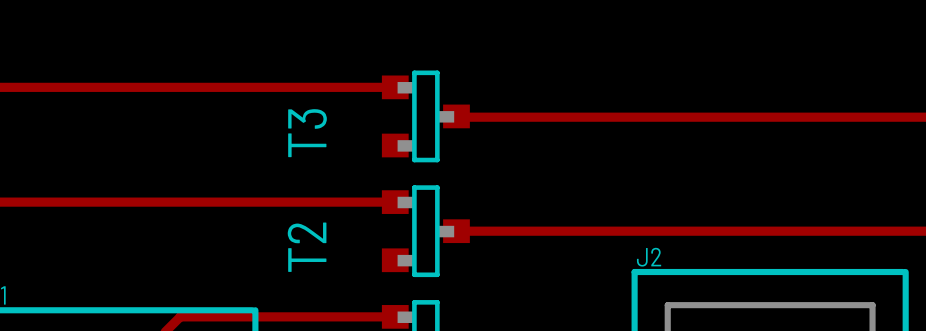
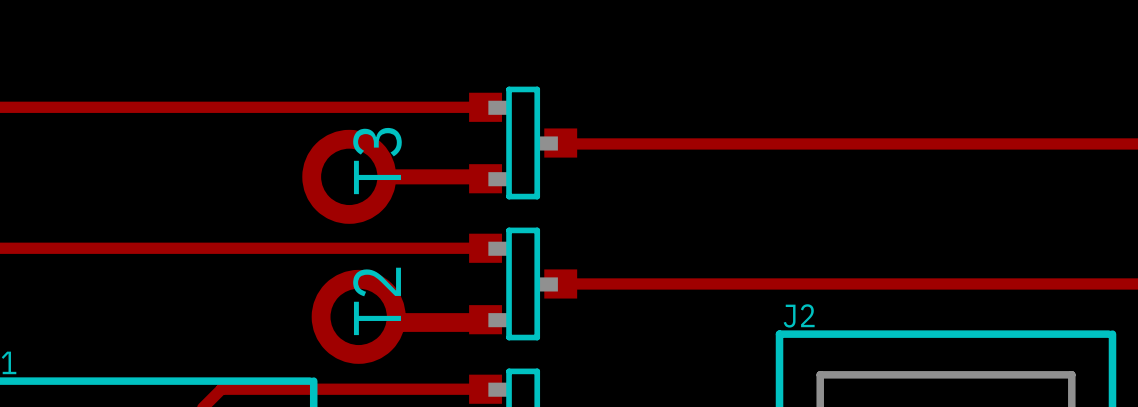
drawing: none -> [302, 129, 397, 224]
track: none -> (386, 176) (476, 176)
drawing: none -> [311, 269, 406, 364]
track: none -> (396, 322) (471, 322)

